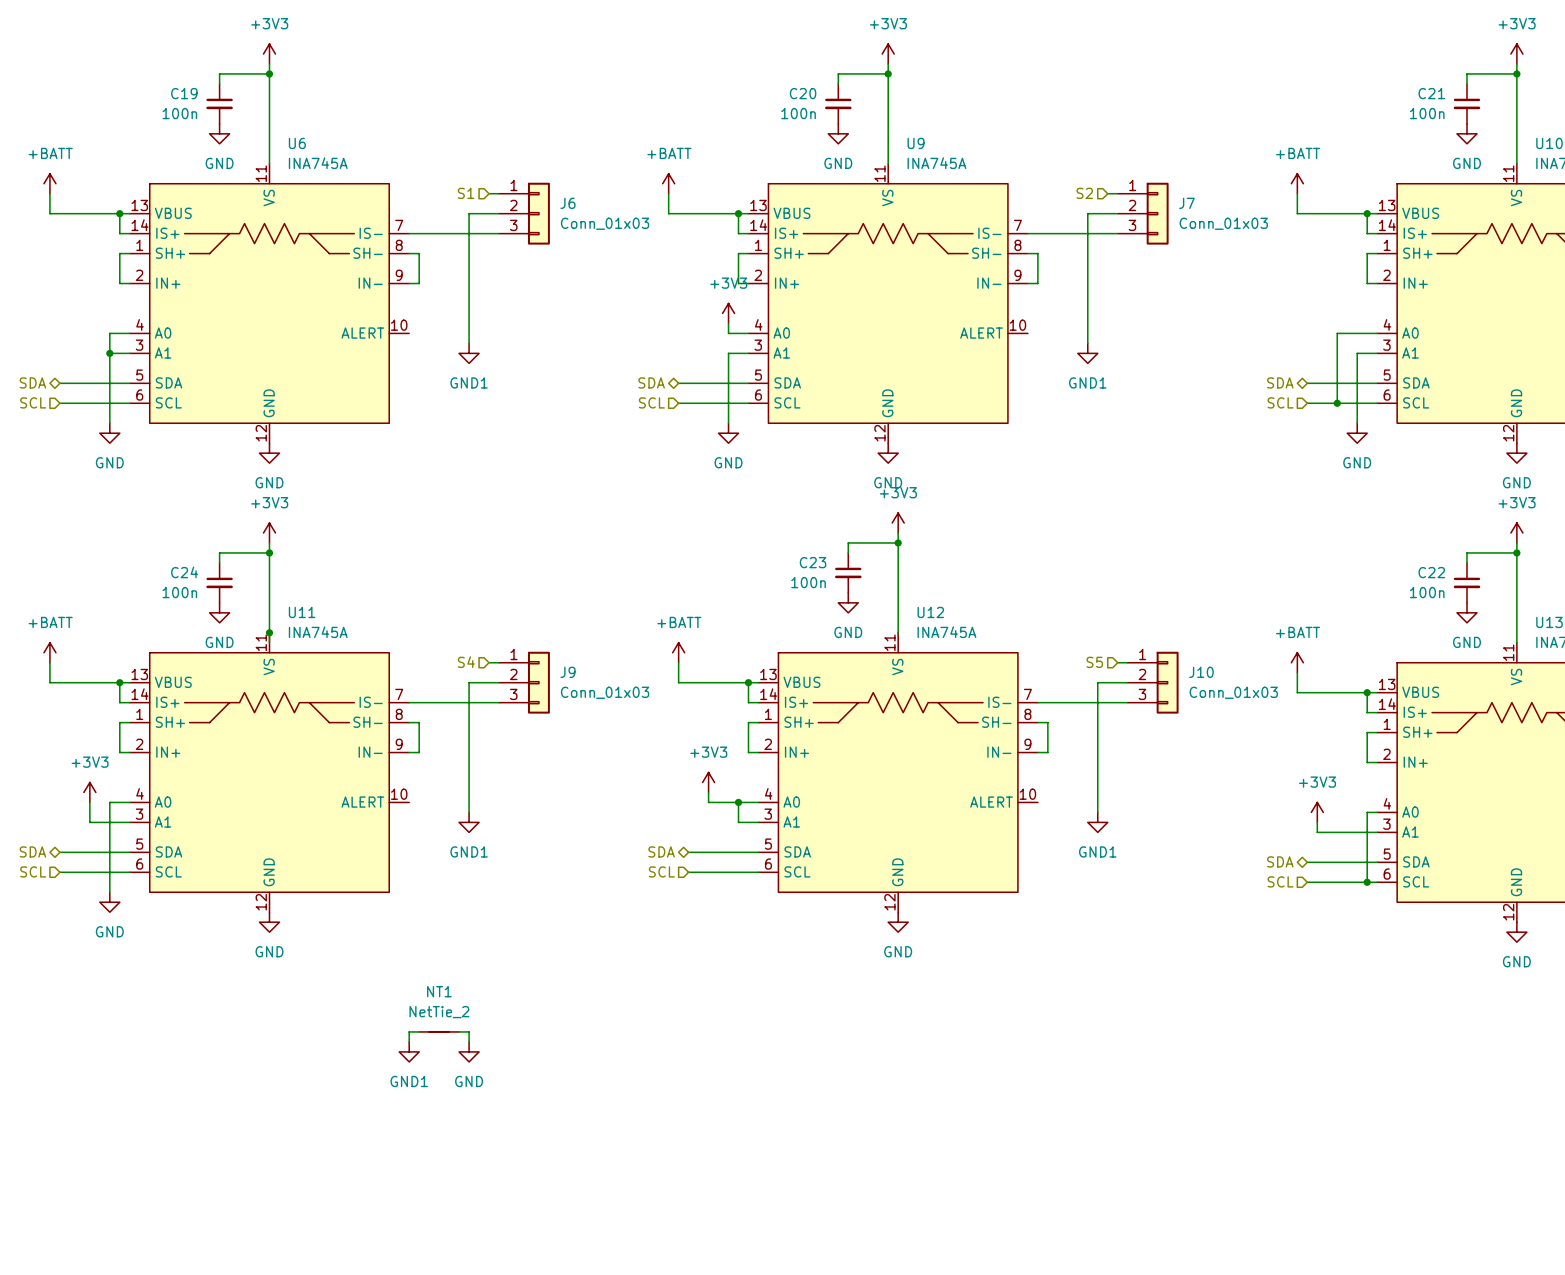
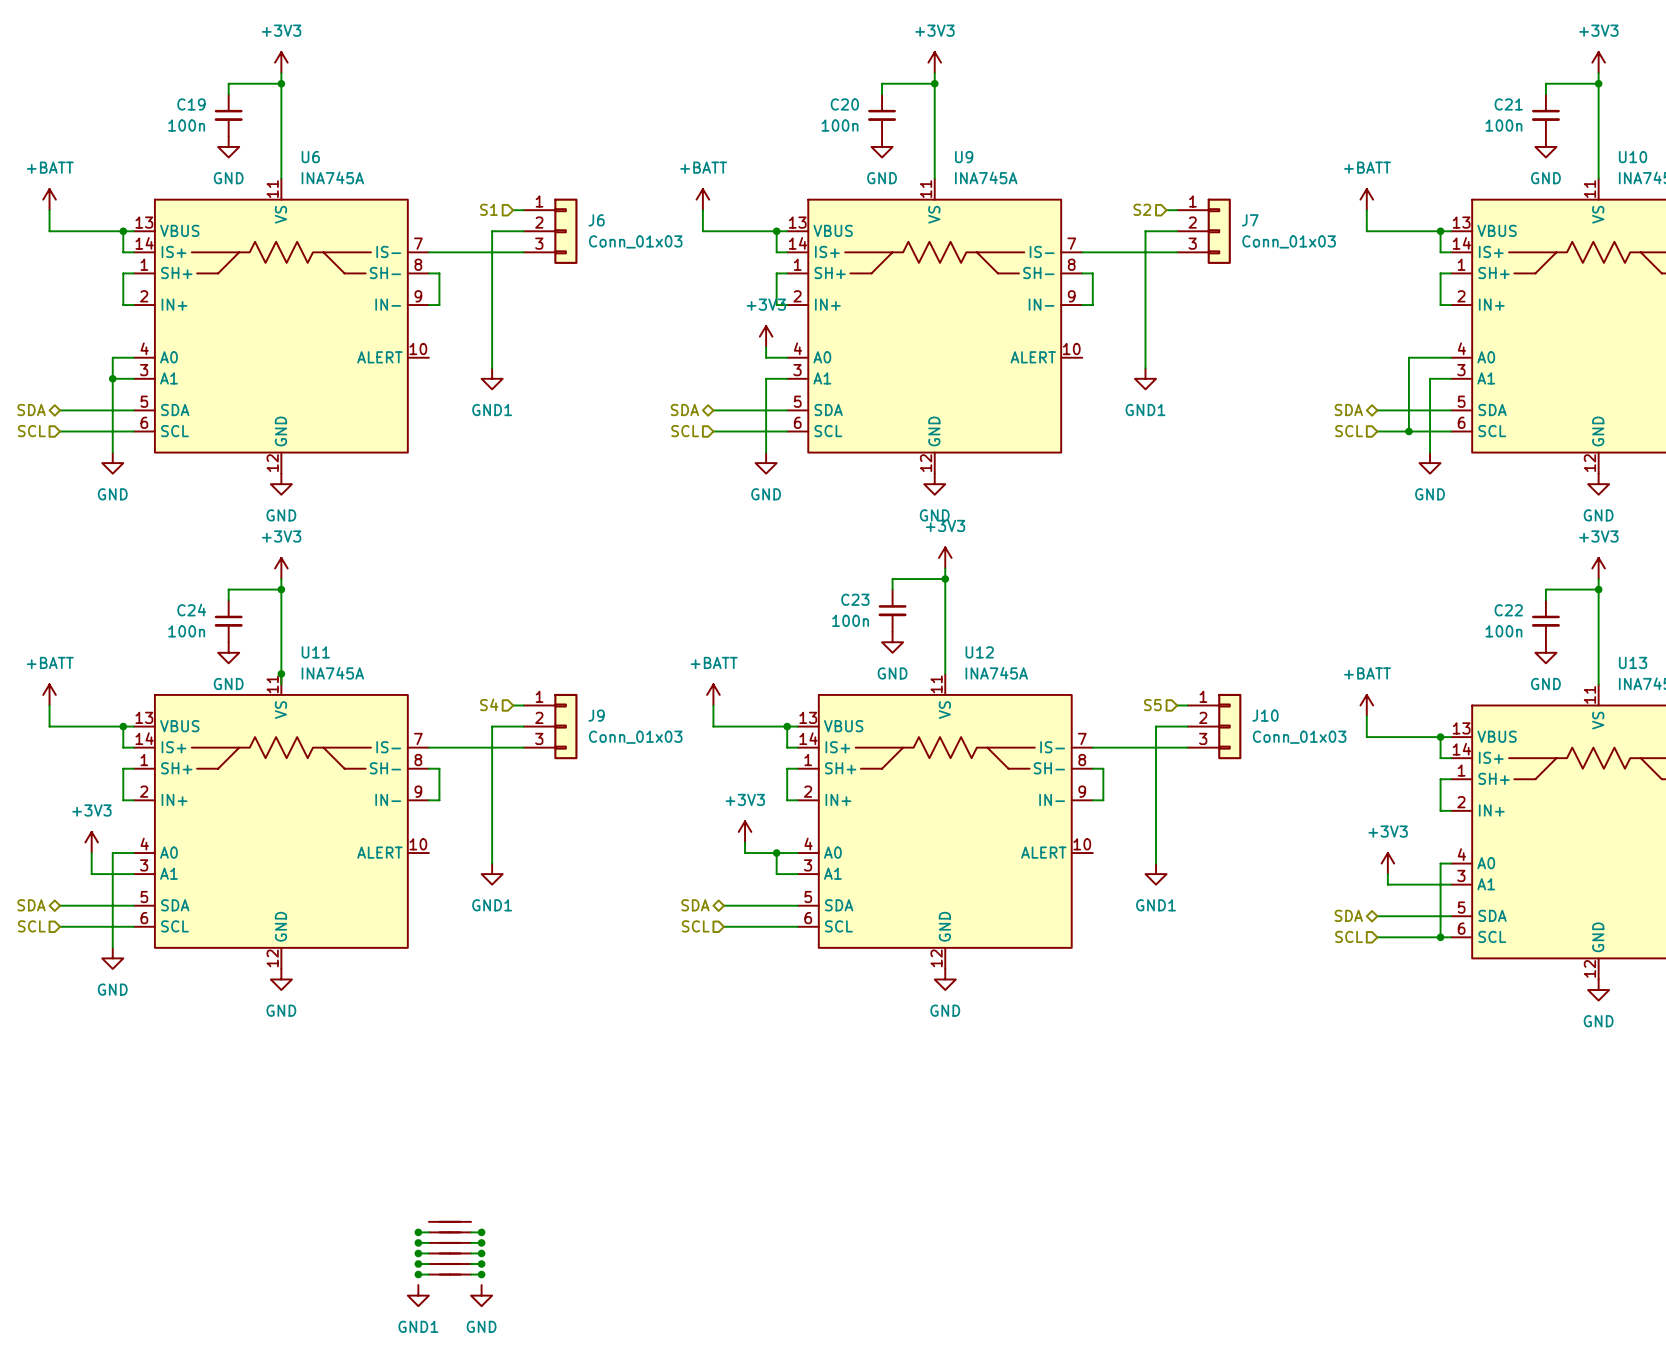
wire: (419, 1031) (409, 1031) (409, 1041) -> none
NT1: NetTie_2 (439, 1031) -> none
wire: (459, 1031) (469, 1031) (469, 1041) -> none
power symbol position: GND1 (409, 1051) -> GND1 (418, 1295)
power symbol position: GND (469, 1051) -> GND (481, 1295)
part: none -> (449, 1221)
wire: none -> (418, 1232) (428, 1232)
junction: none -> (418, 1232)
part: none -> (449, 1232)
wire: none -> (471, 1232) (481, 1232)
junction: none -> (481, 1232)
wire: none -> (418, 1242) (428, 1242)
junction: none -> (418, 1242)
part: none -> (449, 1242)
wire: none -> (471, 1242) (481, 1242)
junction: none -> (481, 1242)
wire: none -> (418, 1253) (428, 1253)
junction: none -> (418, 1253)
part: none -> (449, 1253)
wire: none -> (471, 1253) (481, 1253)
junction: none -> (481, 1253)
wire: none -> (418, 1264) (428, 1264)
junction: none -> (418, 1264)
part: none -> (449, 1264)
wire: none -> (471, 1264) (481, 1264)
junction: none -> (481, 1264)
wire: none -> (418, 1274) (428, 1274)
junction: none -> (418, 1274)
part: none -> (449, 1274)
wire: none -> (471, 1274) (481, 1274)
junction: none -> (481, 1274)

